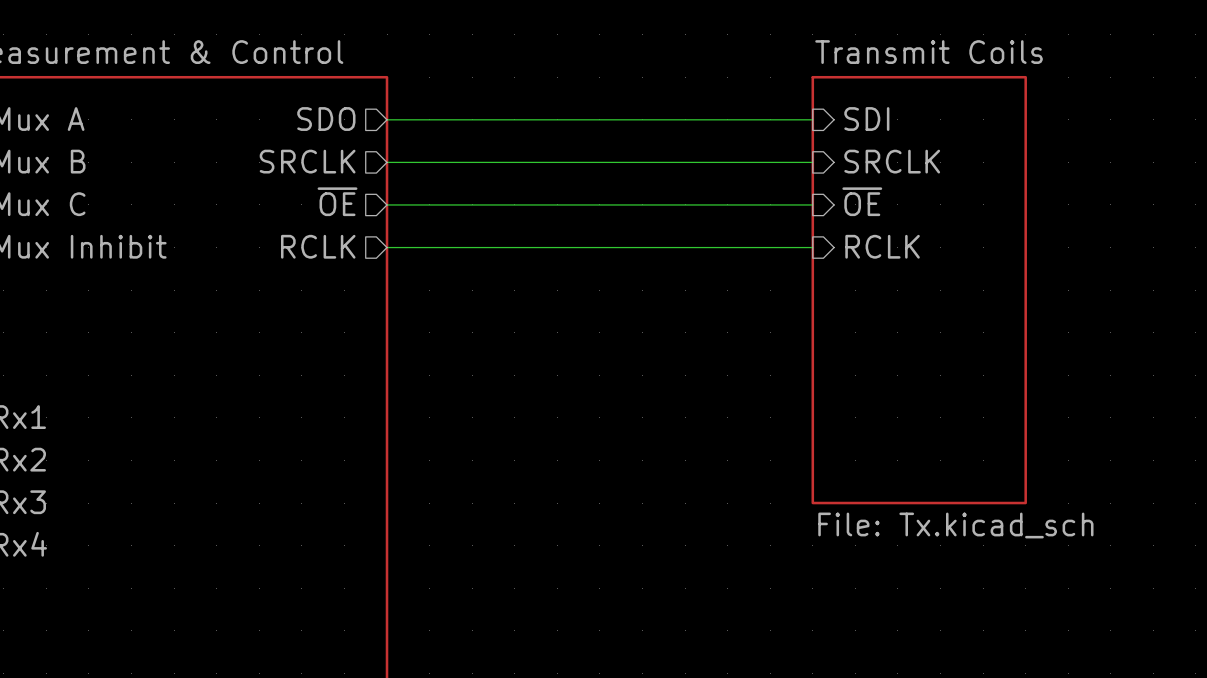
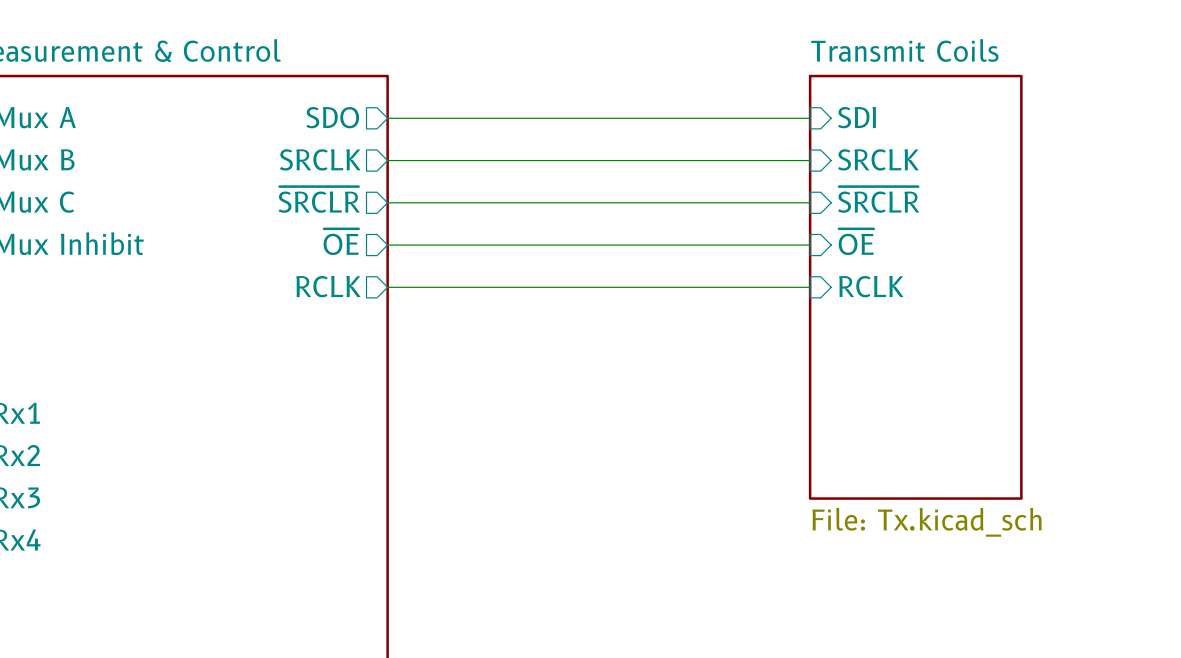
sheet pin: ~{OE} (337, 201) -> ~{SRCLR} (319, 199)
sheet pin: ~{OE} (862, 201) -> ~{SRCLR} (878, 199)
sheet pin: RCLK (318, 246) -> ~{OE} (341, 241)
sheet pin: RCLK (882, 246) -> ~{OE} (856, 241)
sheet pin: none -> RCLK (328, 286)
sheet pin: none -> RCLK (871, 286)
wire: none -> (387, 287) (810, 287)

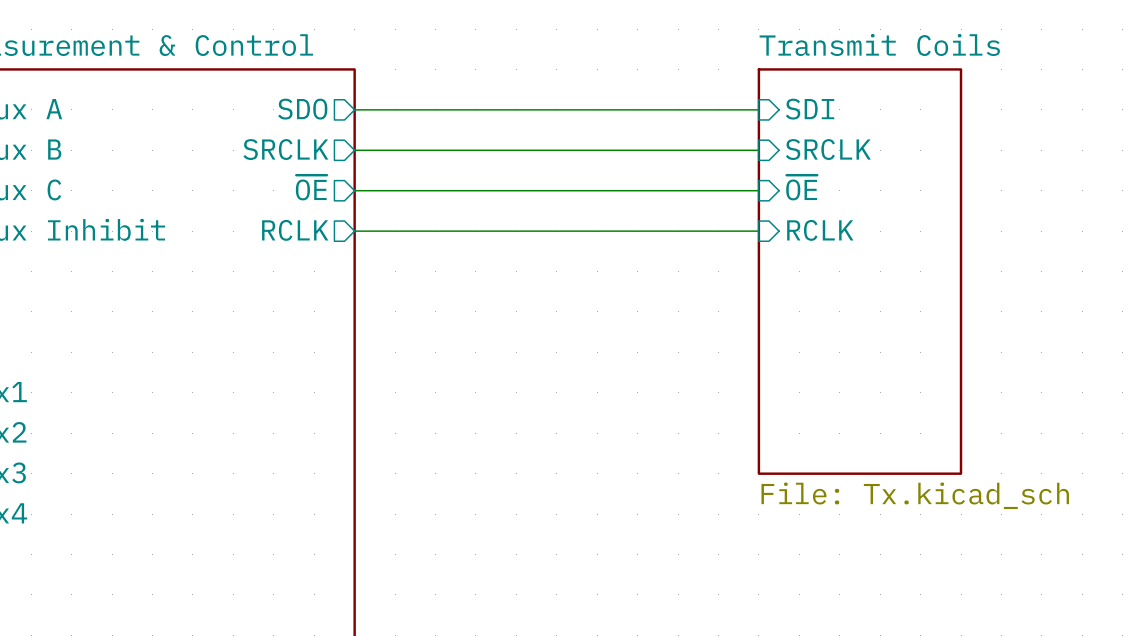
sheet pin: ~{SRCLR} (319, 199) -> ~{OE} (311, 187)
sheet pin: ~{SRCLR} (878, 199) -> ~{OE} (801, 187)
sheet pin: ~{OE} (341, 241) -> RCLK (295, 230)
sheet pin: ~{OE} (856, 241) -> RCLK (820, 230)
sheet pin: RCLK (328, 286) -> none
sheet pin: RCLK (871, 286) -> none
wire: (387, 287) (810, 287) -> none

